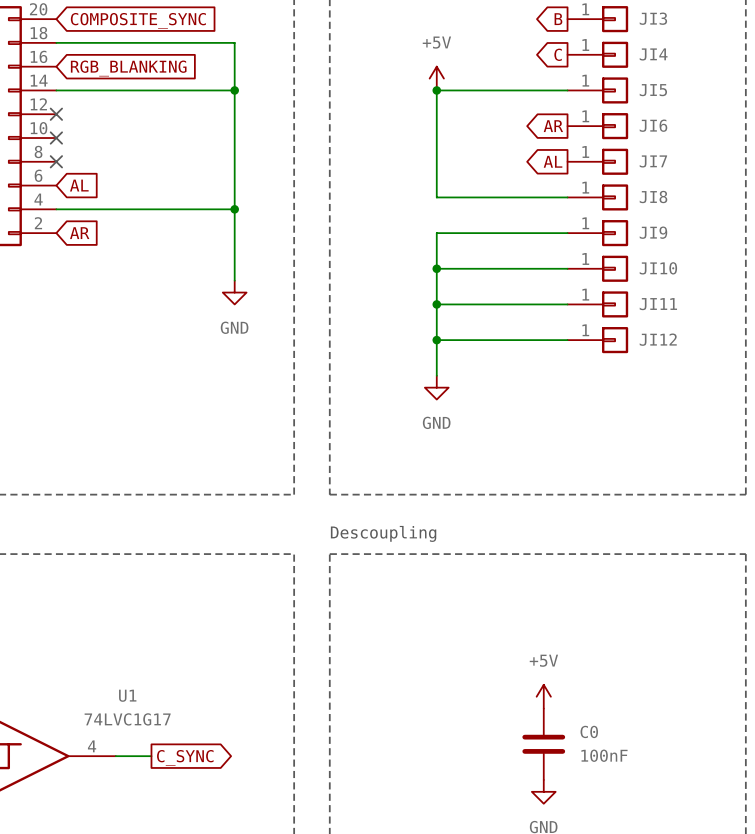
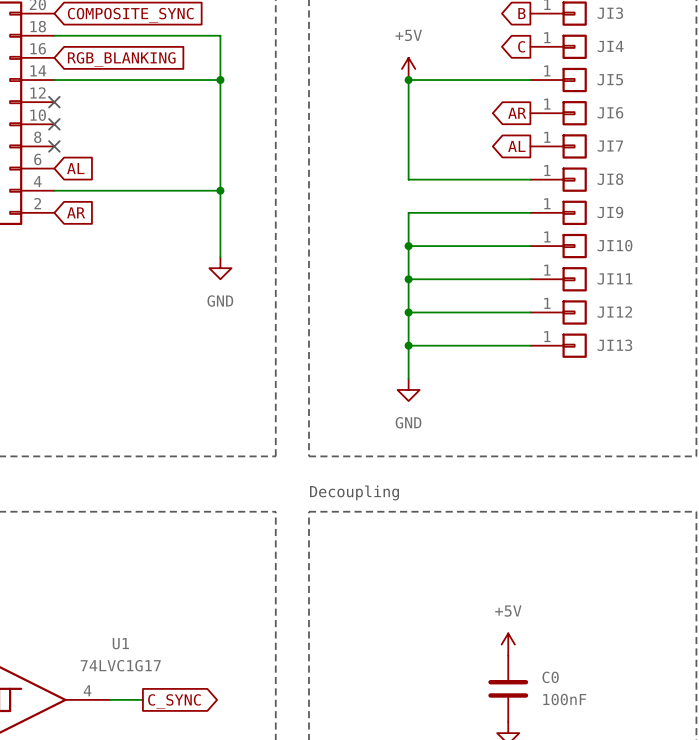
junction: none -> (408, 345)
wire: none -> (530, 345) (408, 345) (408, 378)
JI13: none -> (558, 345)
power symbol position: GND (436, 387) -> GND (408, 389)
text: Descoupling (383, 533) -> Decoupling (354, 492)

